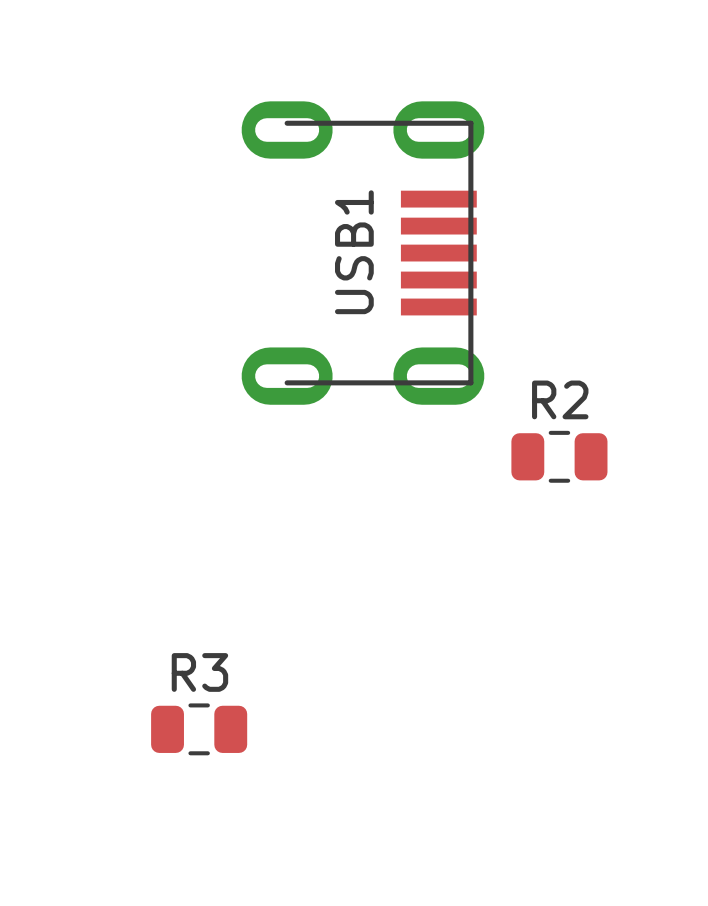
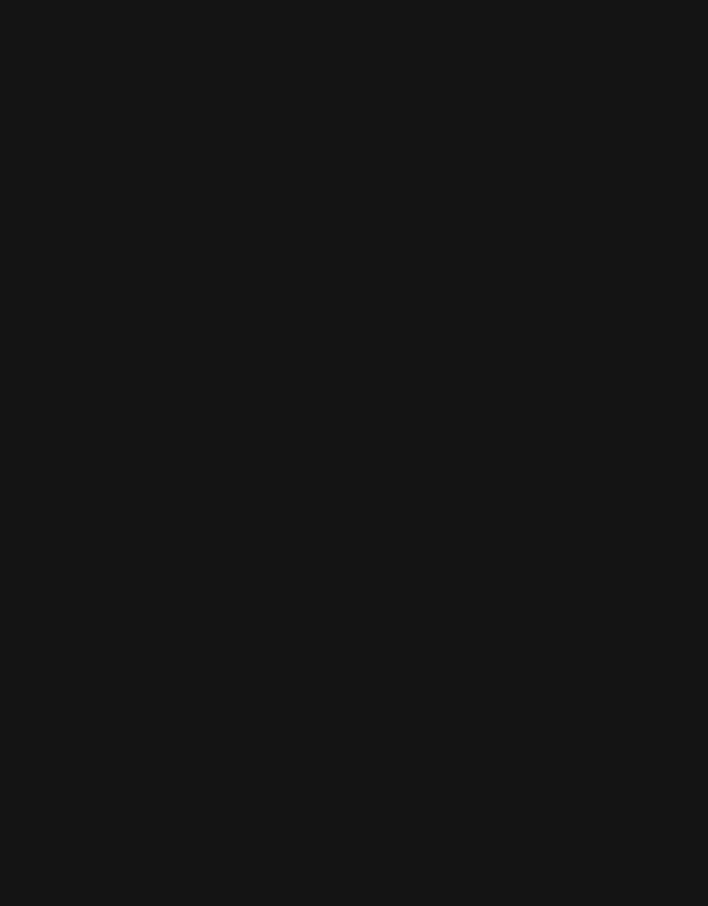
USB1: (362, 253) -> none
R2: (559, 456) -> none
R3: (199, 729) -> none

